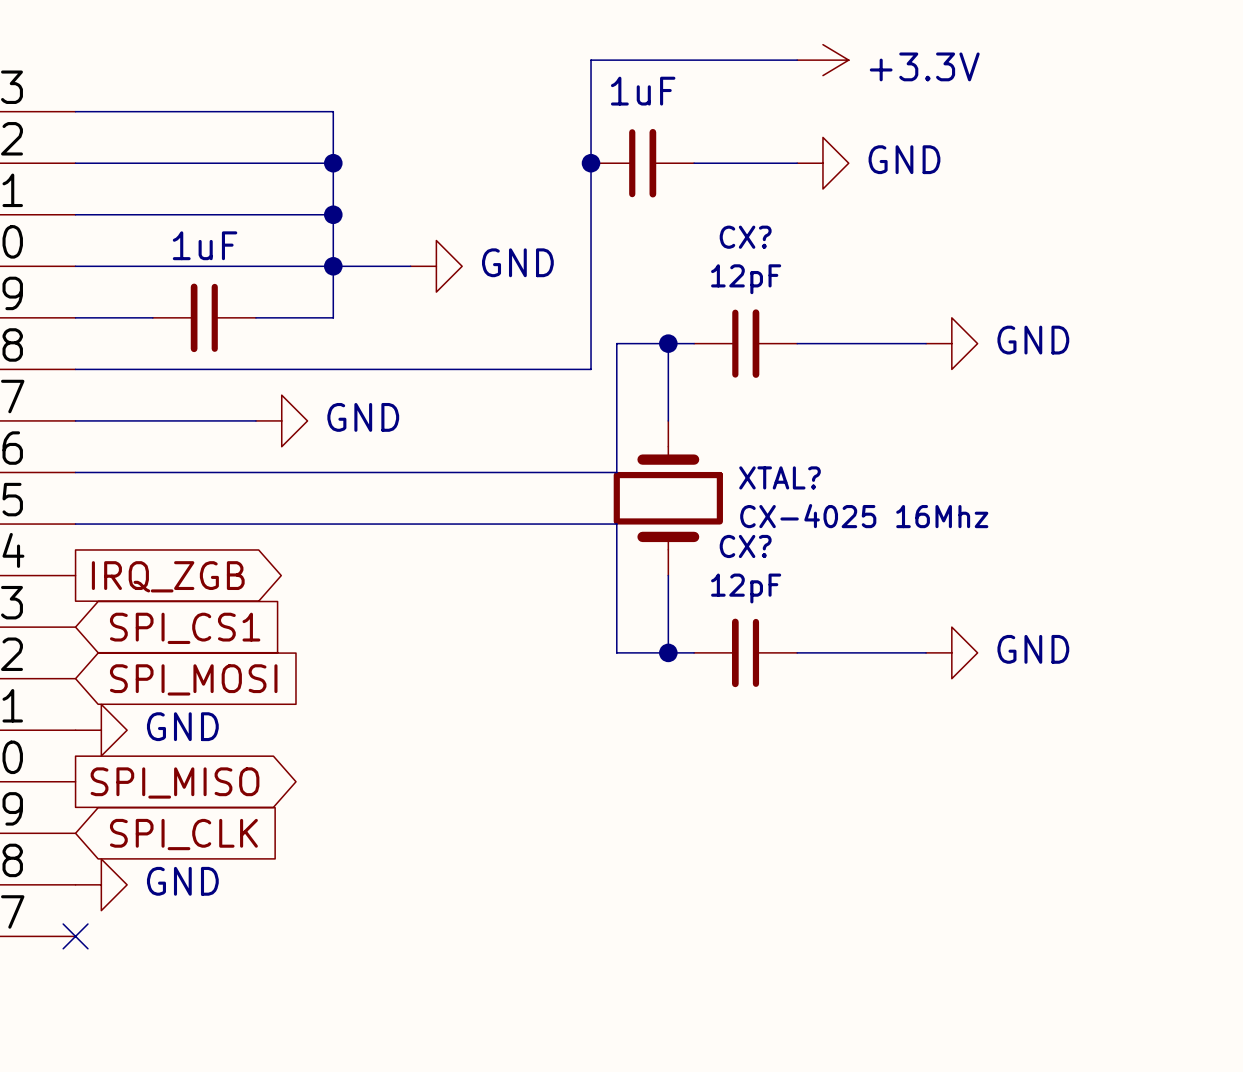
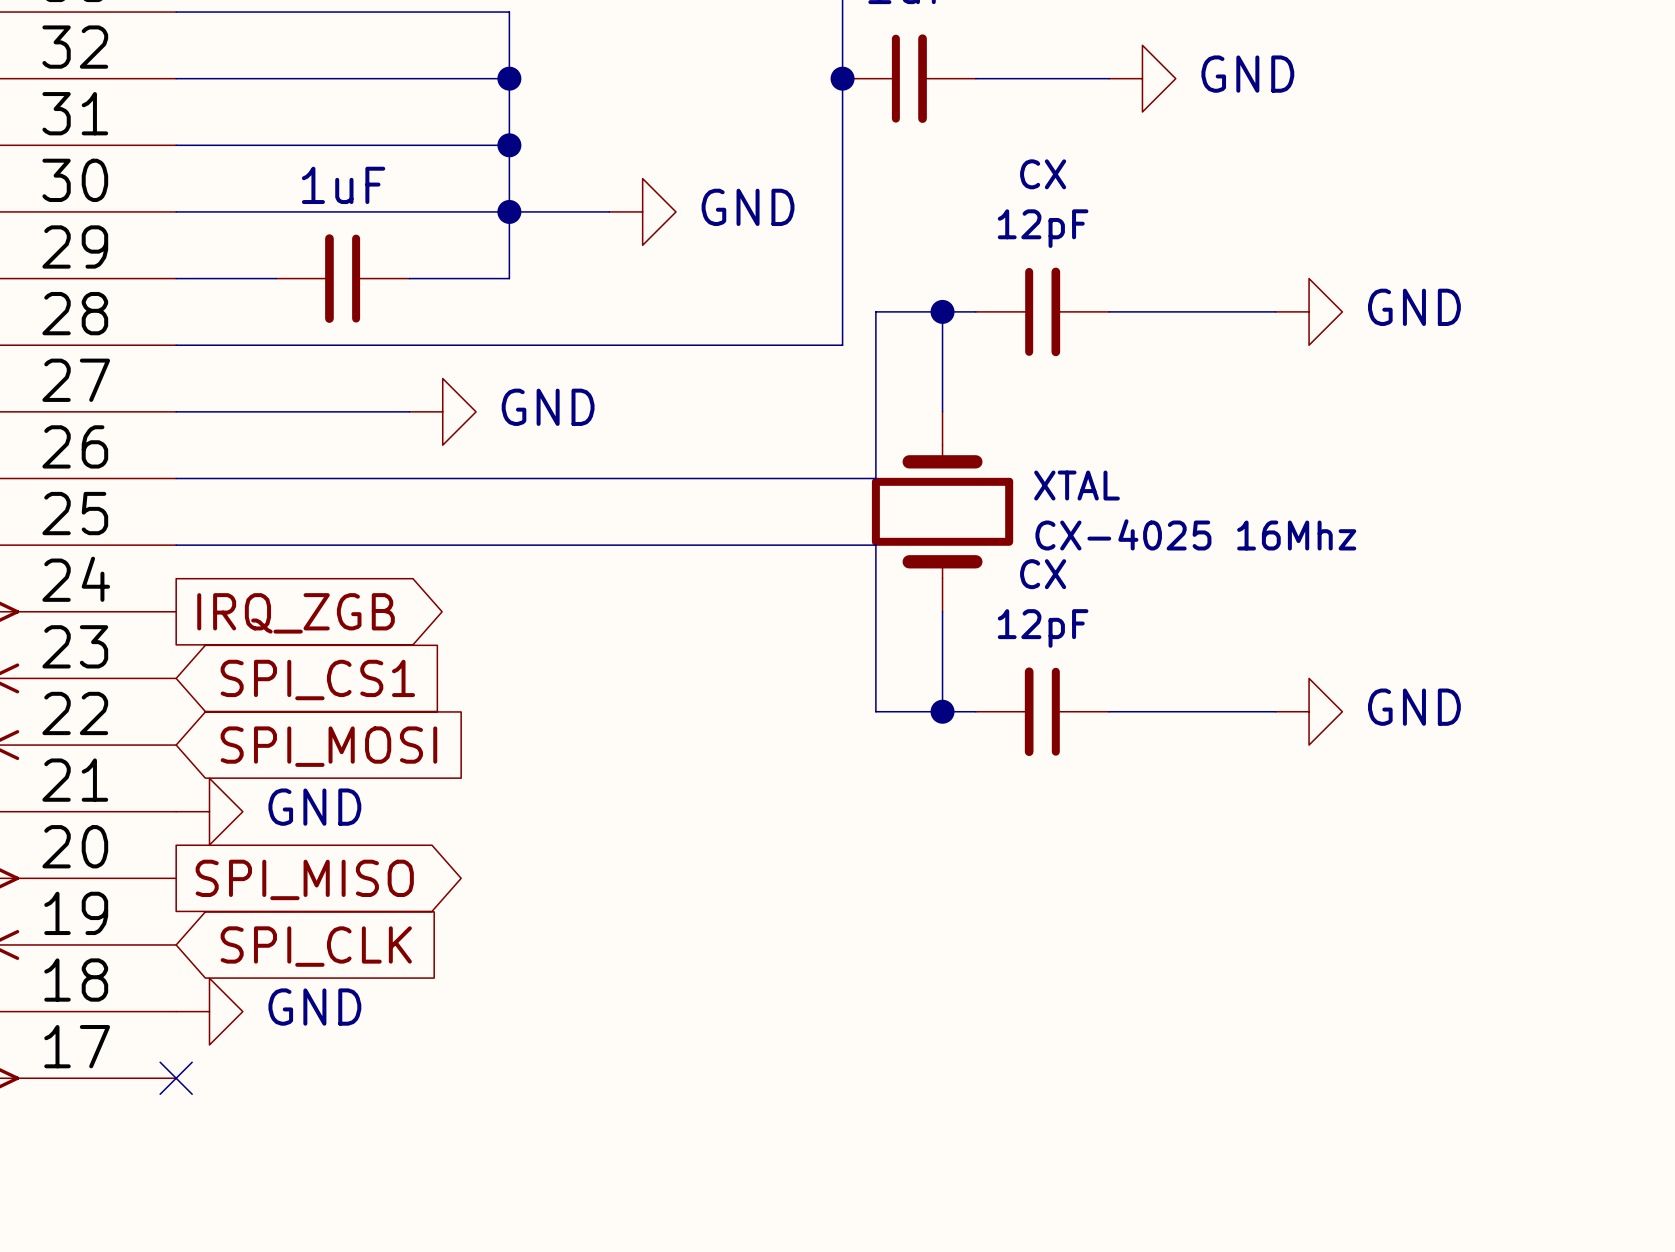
CX? name: CX? (745, 237) -> CX (1043, 174)
XTAL? name: XTAL? (780, 477) -> XTAL (1077, 485)
CX? name: CX? (745, 546) -> CX (1043, 574)

